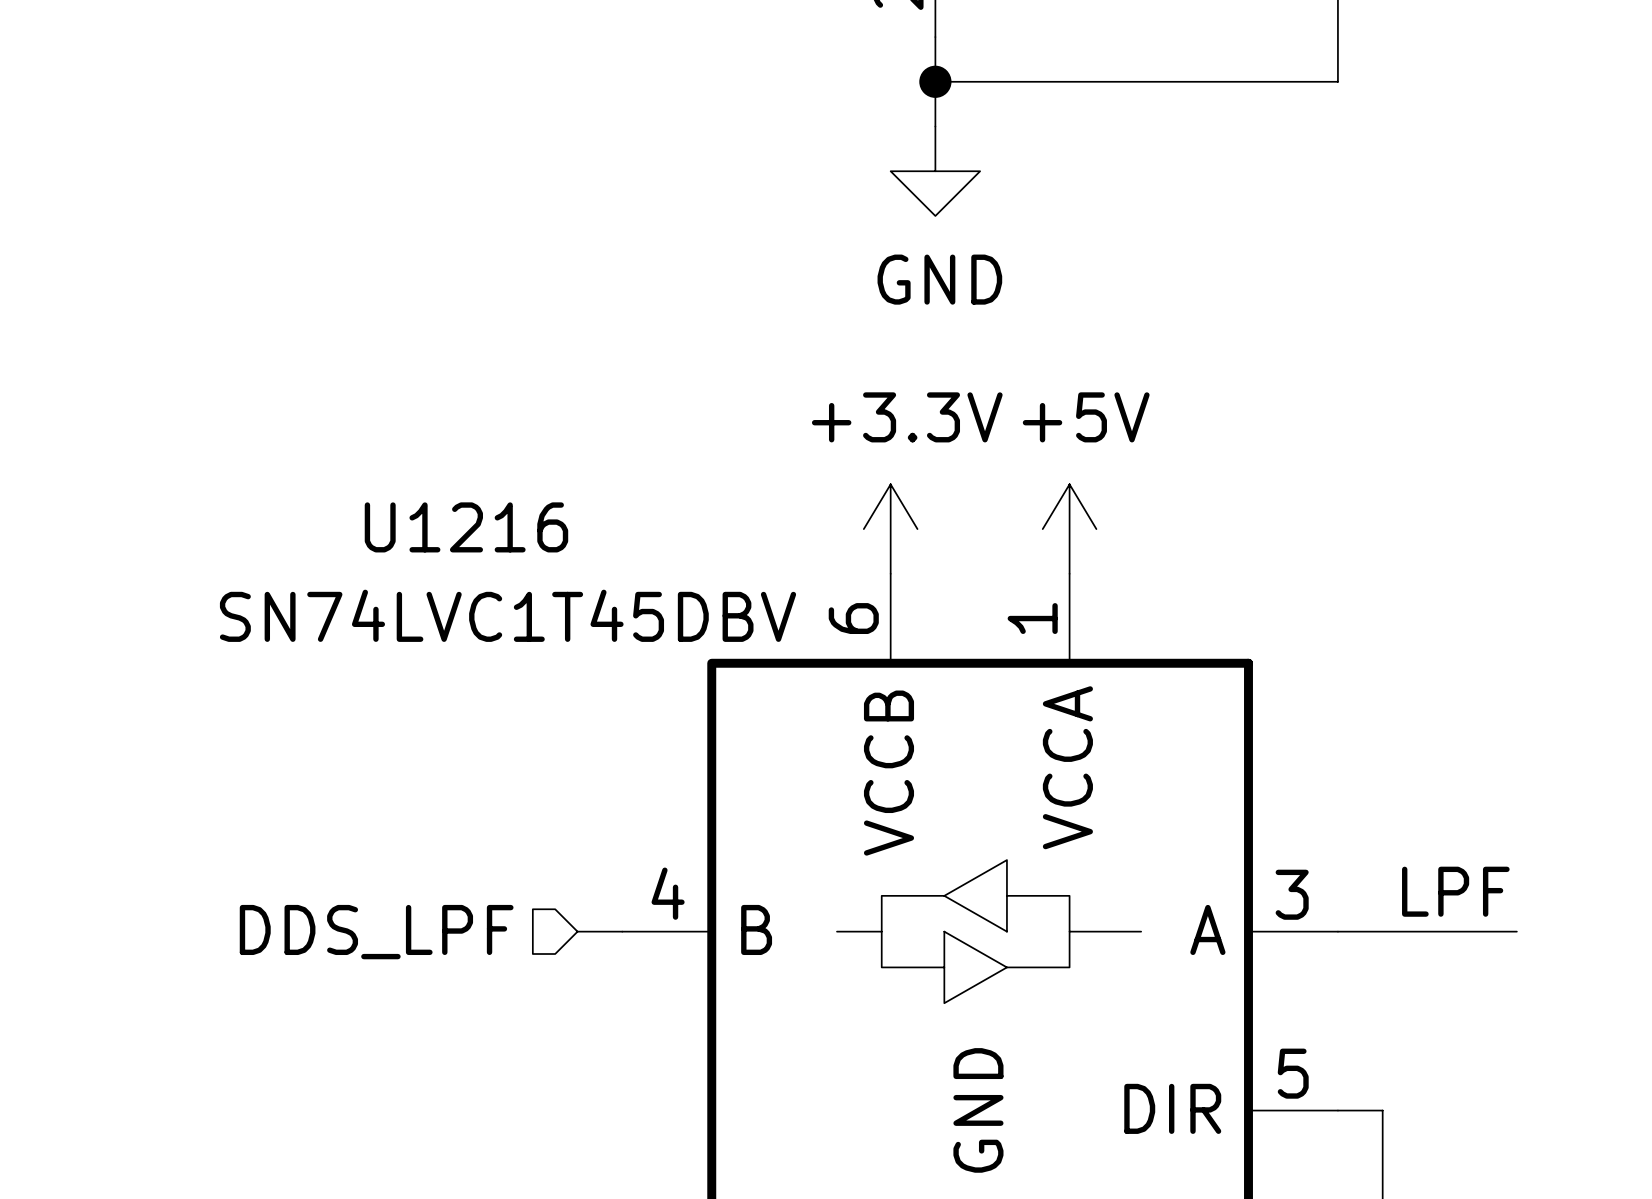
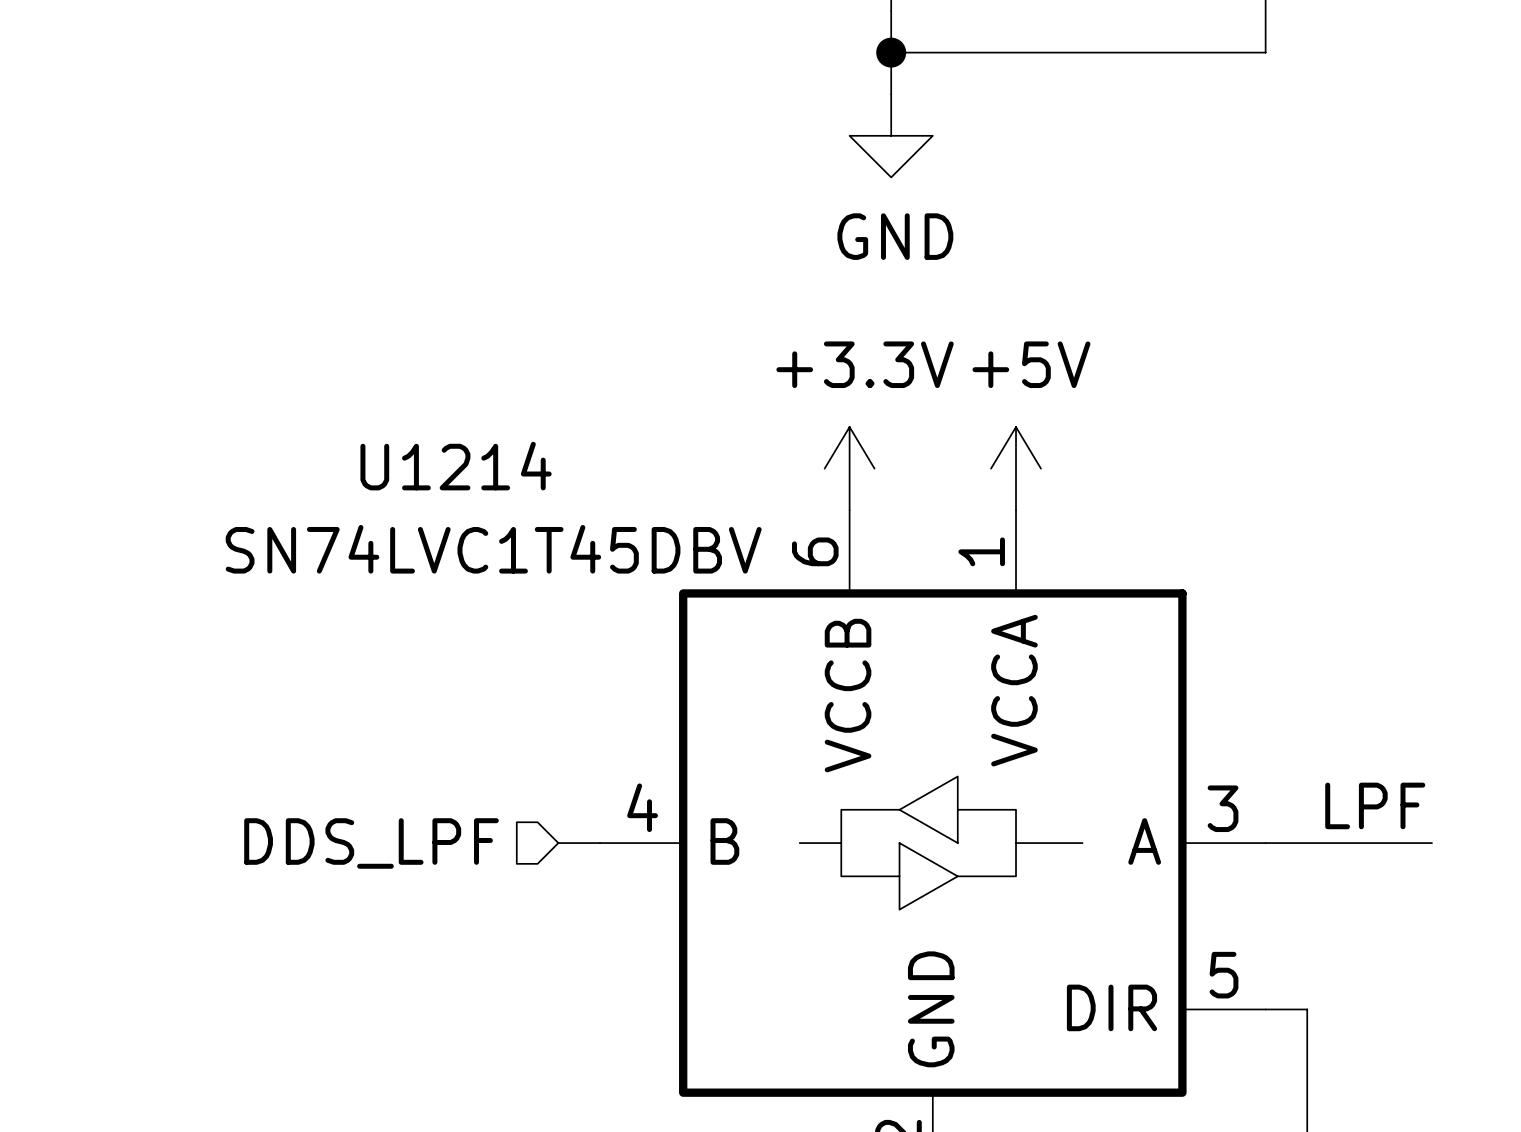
U1216 name: U1216 (466, 527) -> U1214 (456, 466)

